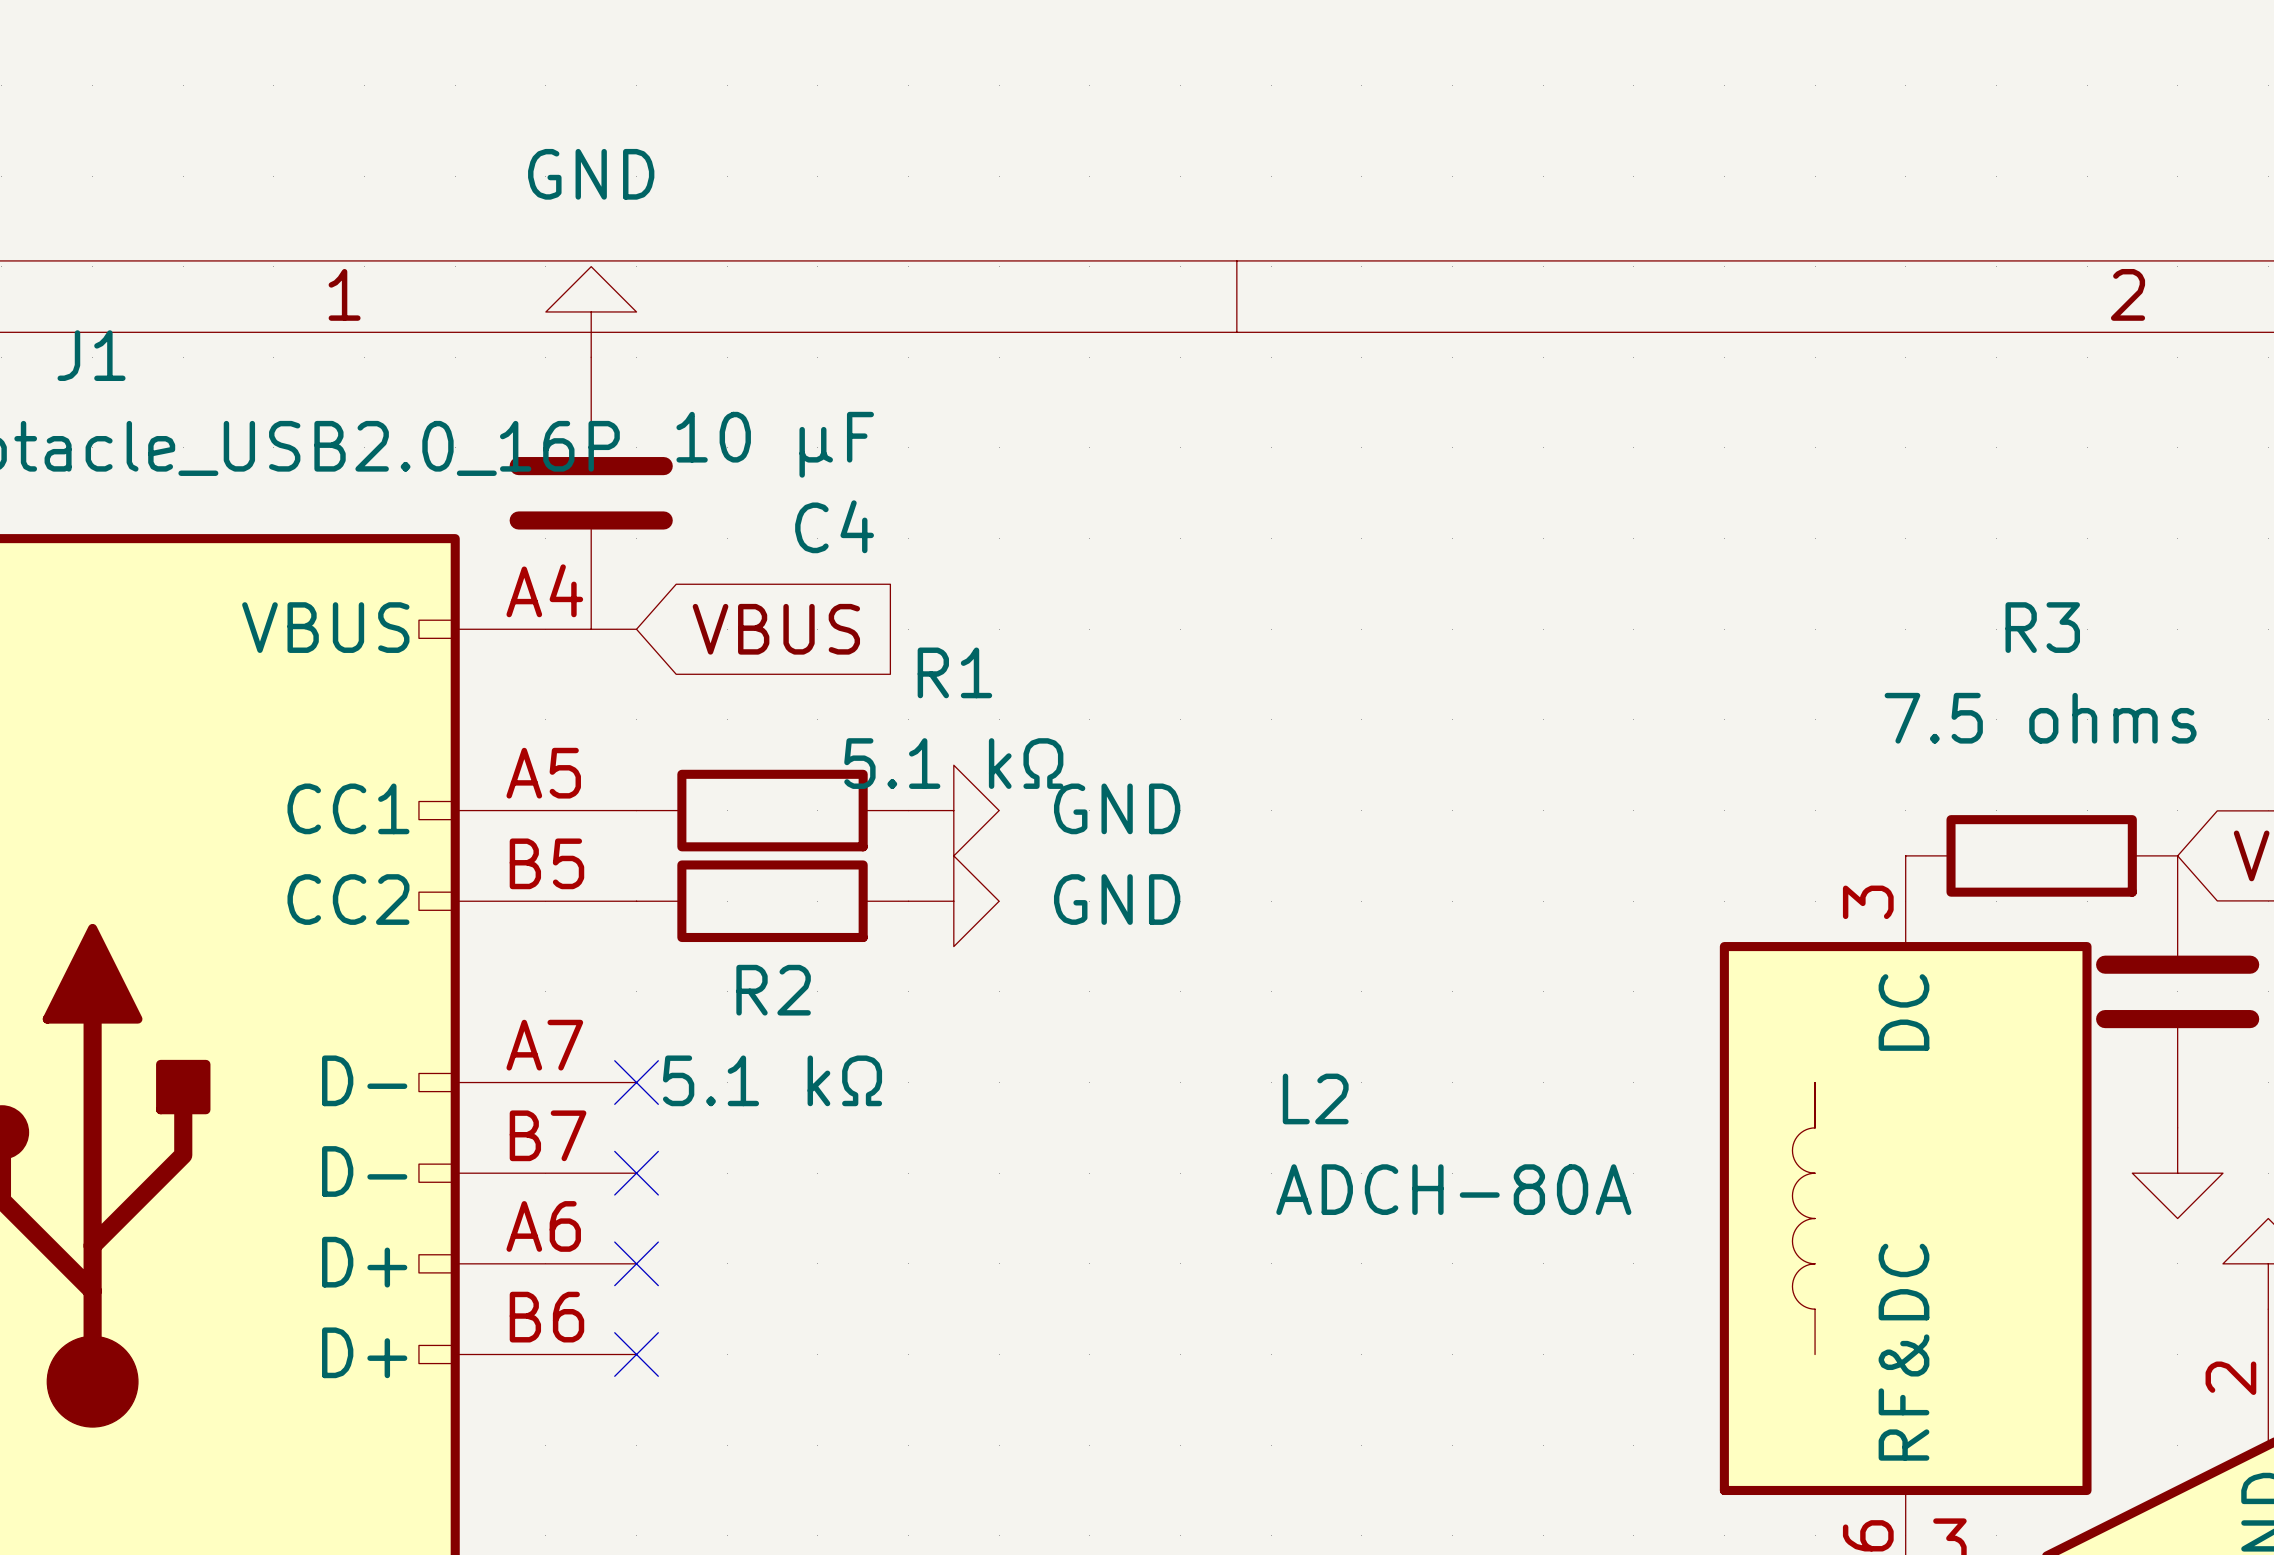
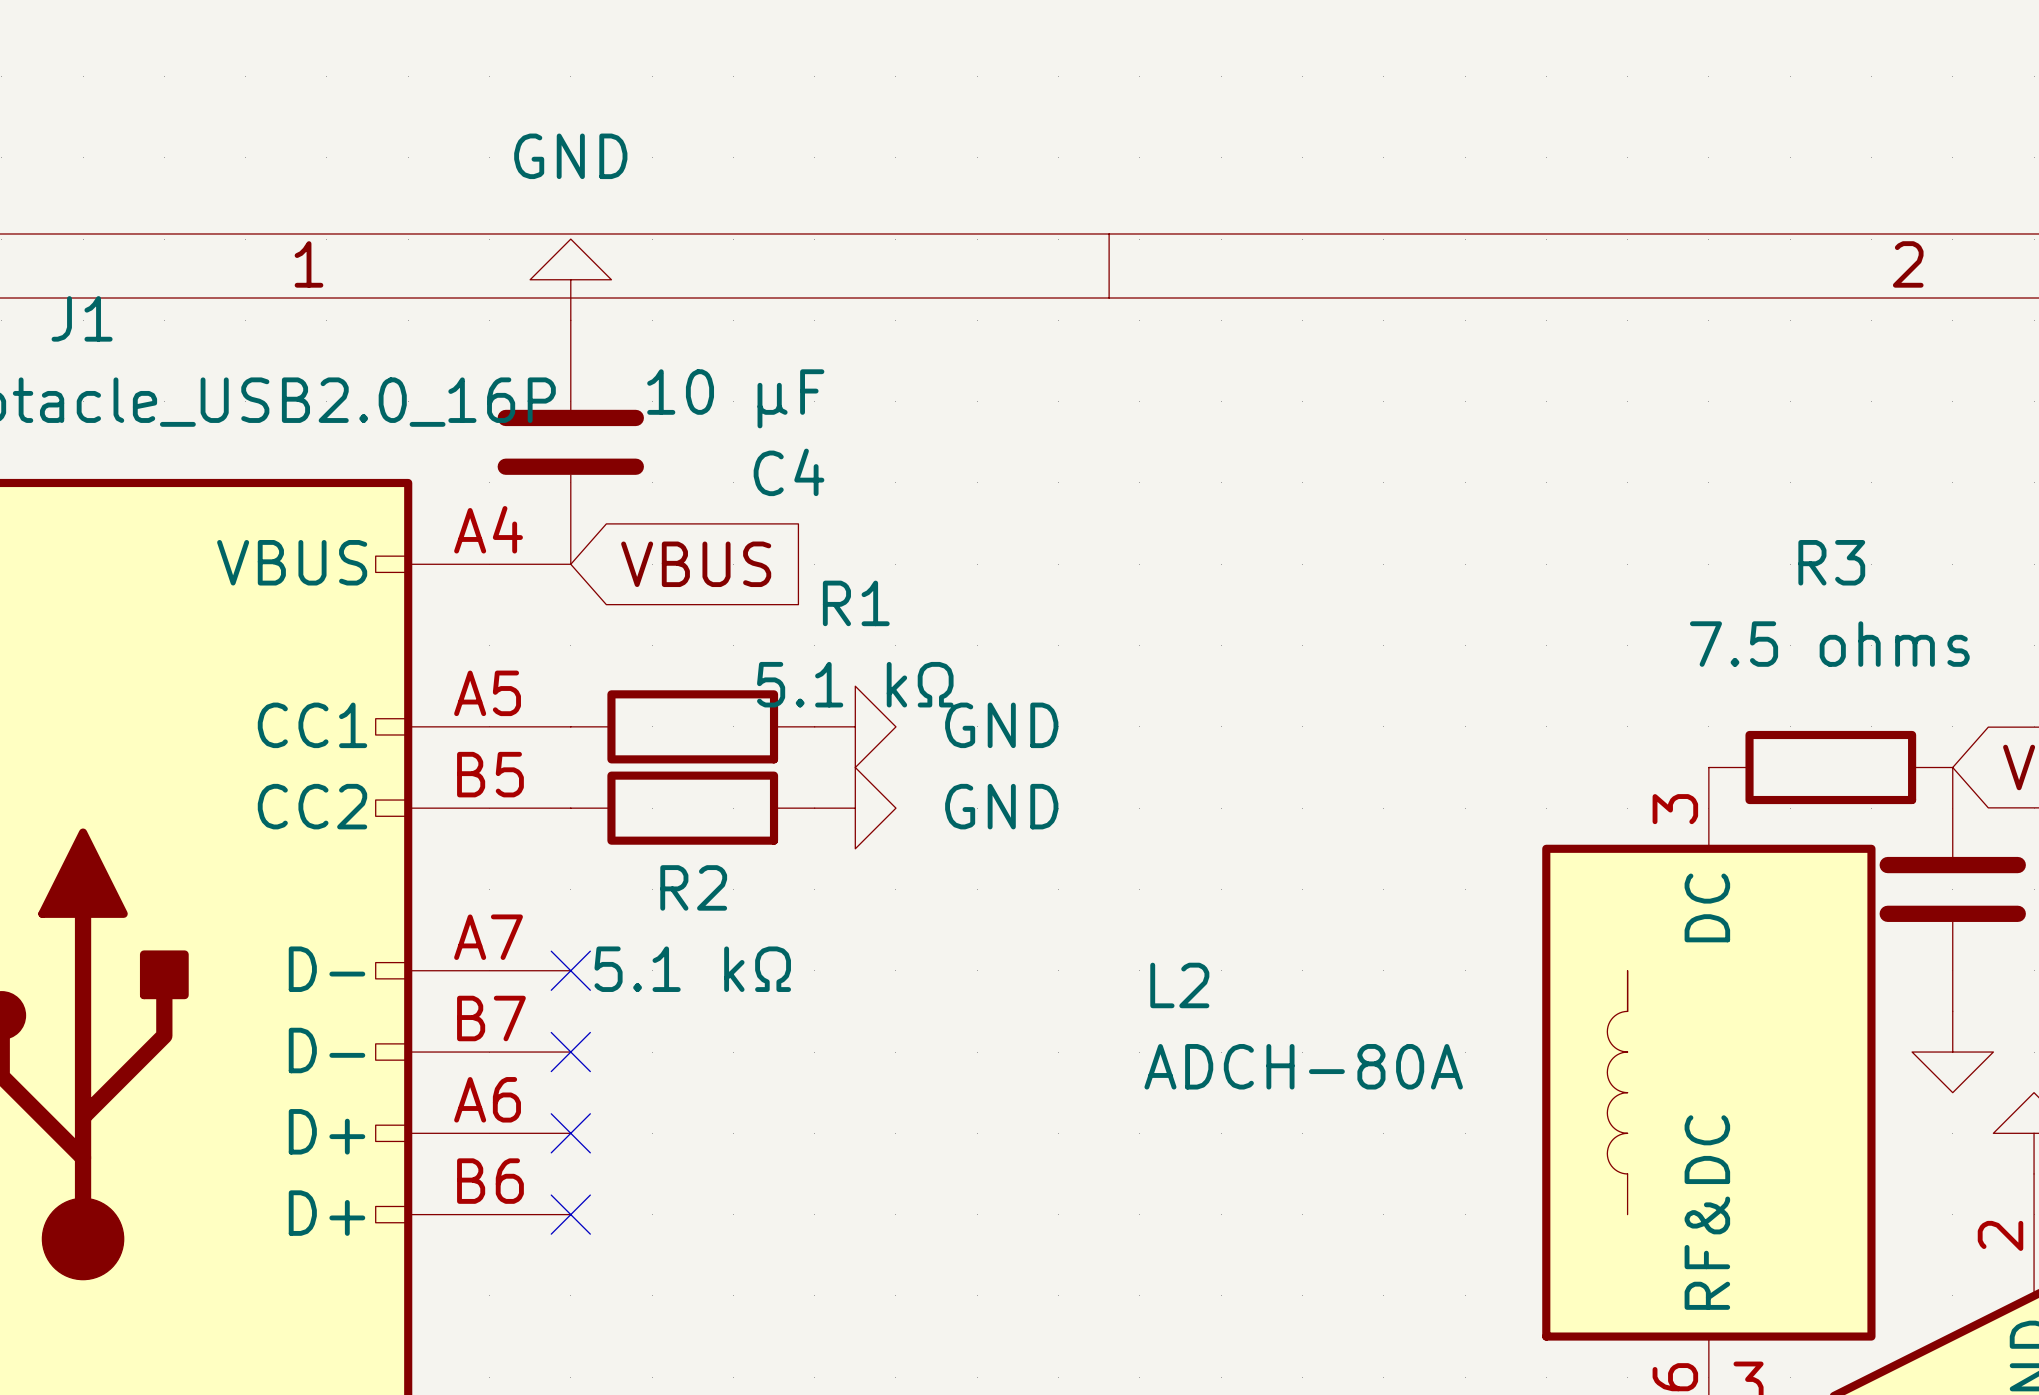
power symbol position: GND (591, 311) -> GND (570, 279)
C4 position: (591, 493) -> (570, 442)

